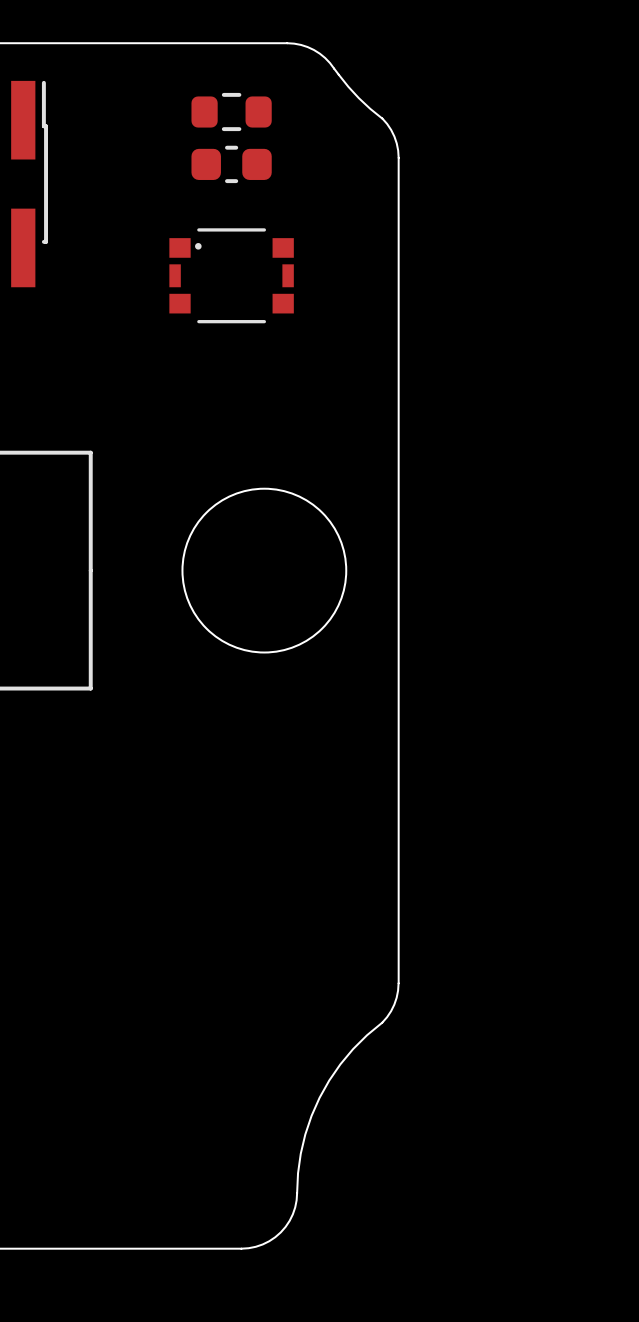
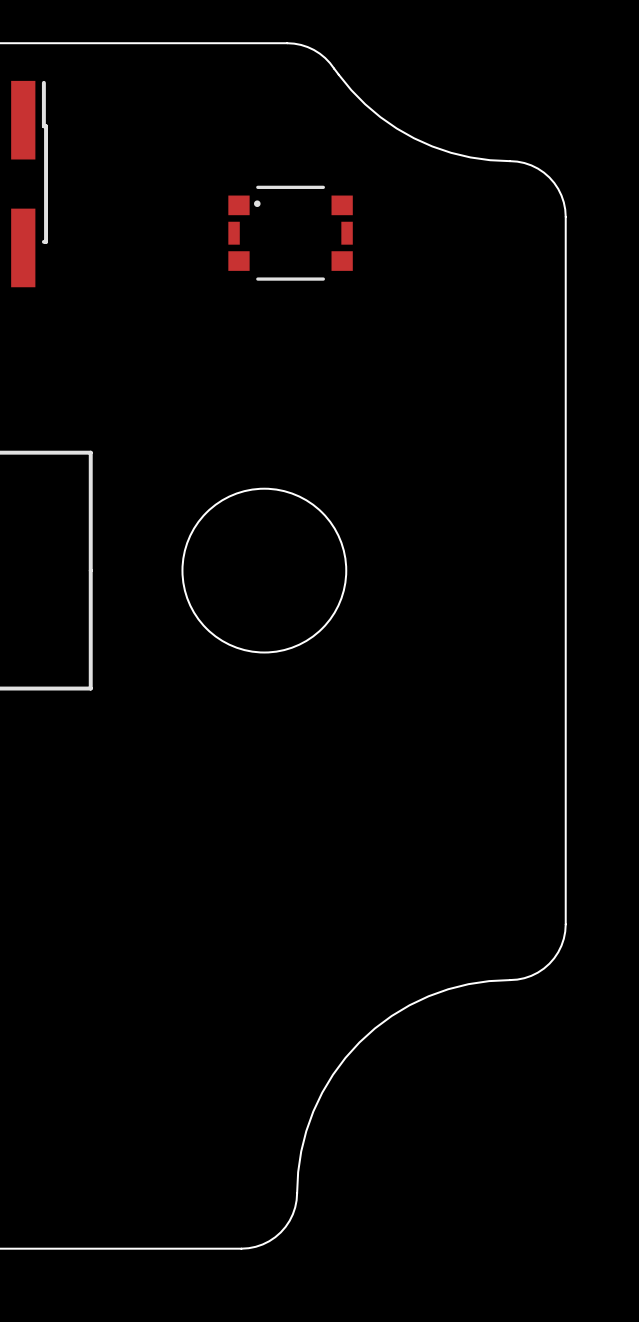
board edge: (338, 74) (358, 98) (387, 123) (394, 136) (398, 150) (398, 983) (394, 1004) (387, 1017) (353, 1049) (329, 1080) (319, 1097) (311, 1115) (300, 1153) (297, 1193) -> (338, 74) (365, 104) (396, 128) (414, 138) (451, 152) (470, 157) (517, 161) (531, 165) (543, 172) (554, 182) (563, 202) (565, 216) (565, 924) (563, 938) (558, 952) (549, 963) (537, 972) (517, 979) (468, 984) (428, 996) (391, 1015) (359, 1042) (333, 1074) (313, 1111) (301, 1151) (297, 1193)
part: (231, 112) -> none
part: (231, 164) -> none
part position: (231, 275) -> (290, 233)

